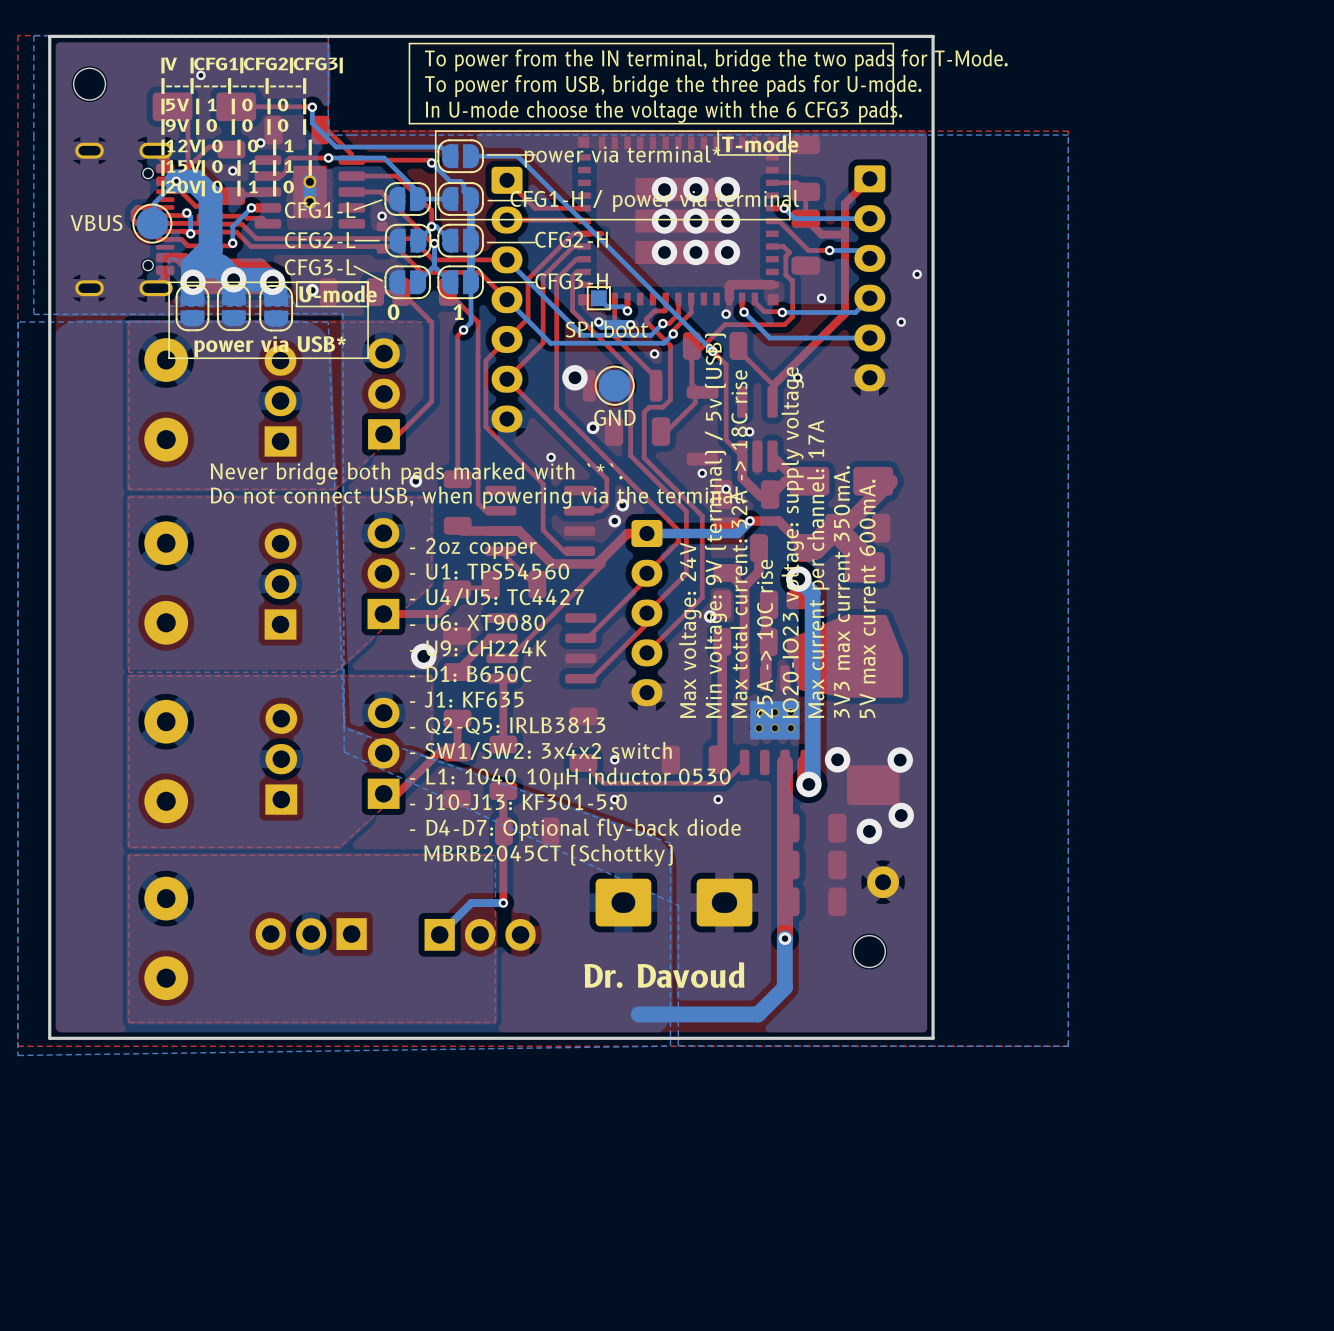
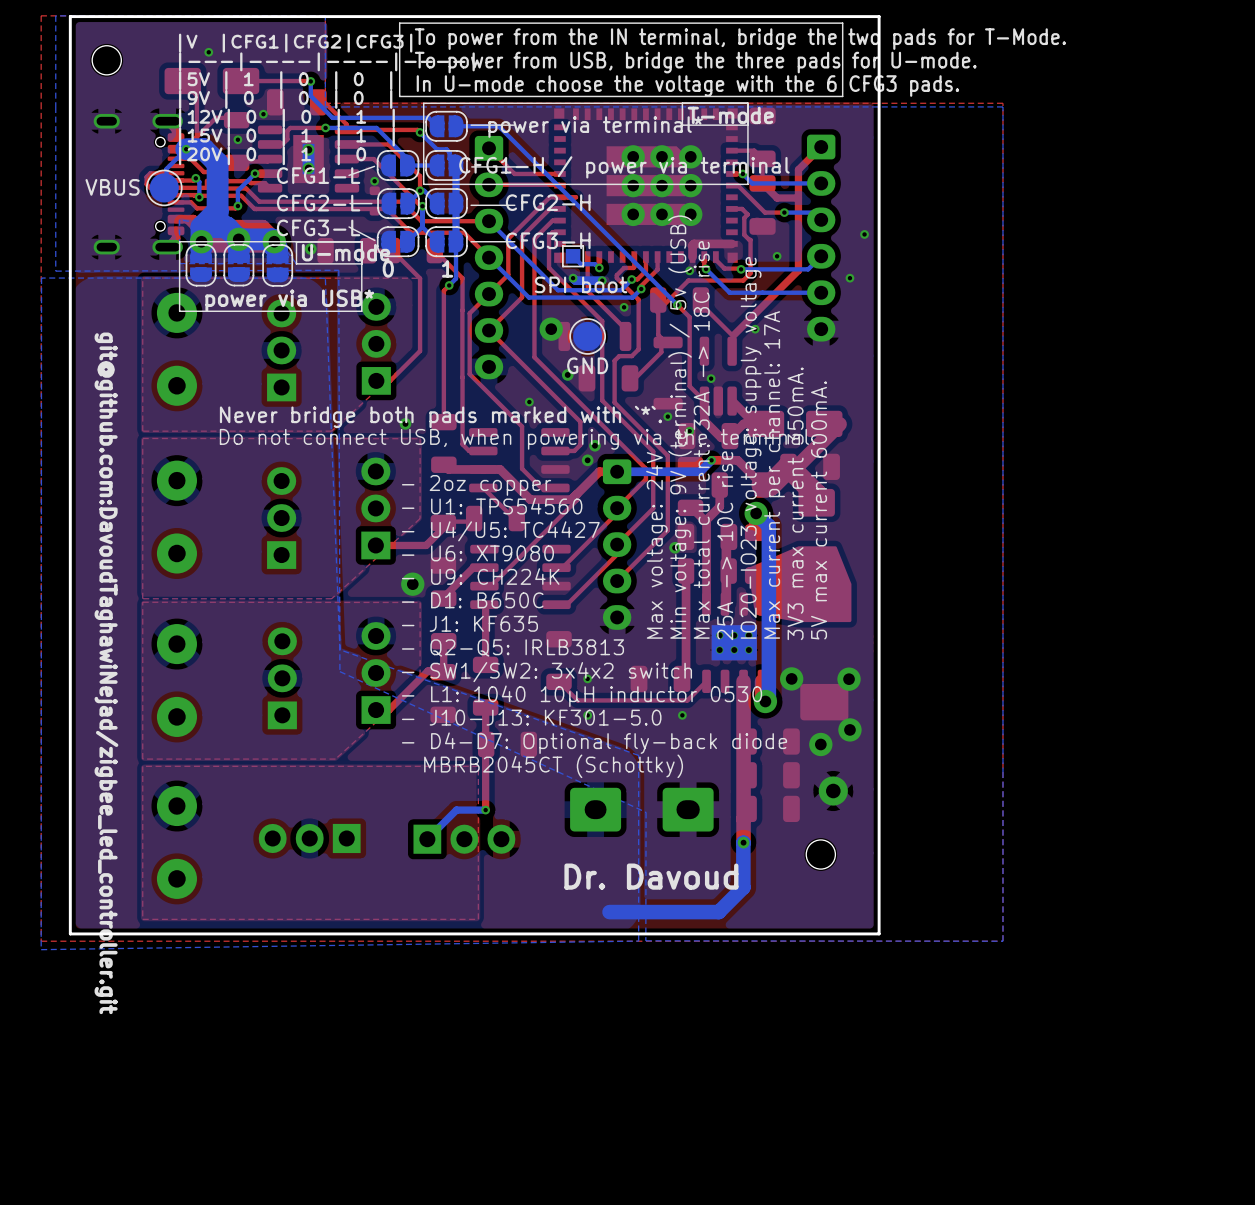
text: none -> git@github.com:DavoudTaghawiNejad/zigbee_led_controller.git (106, 673)

